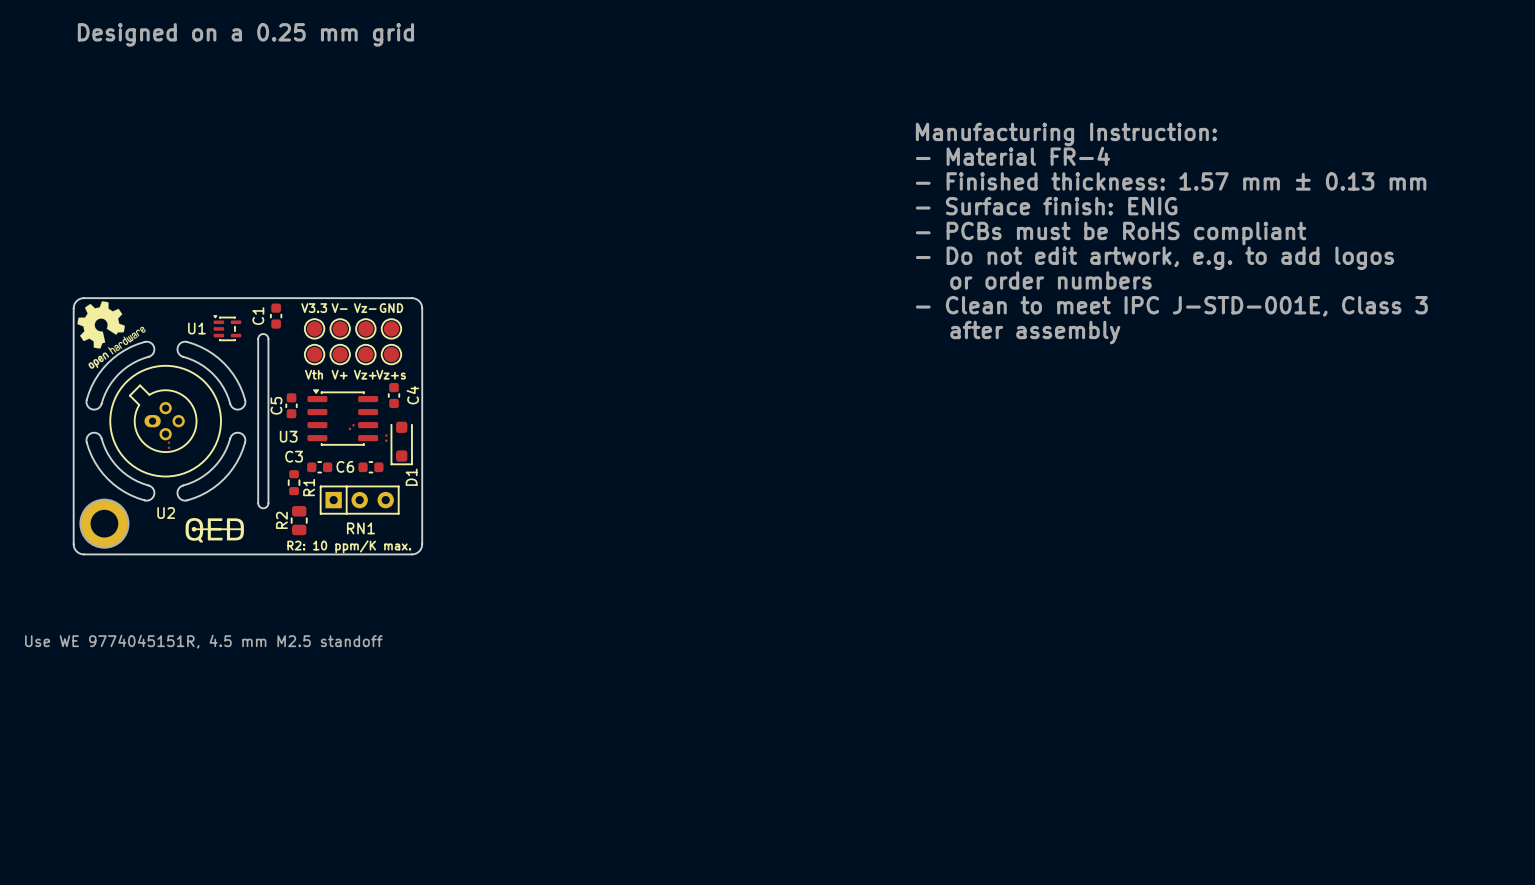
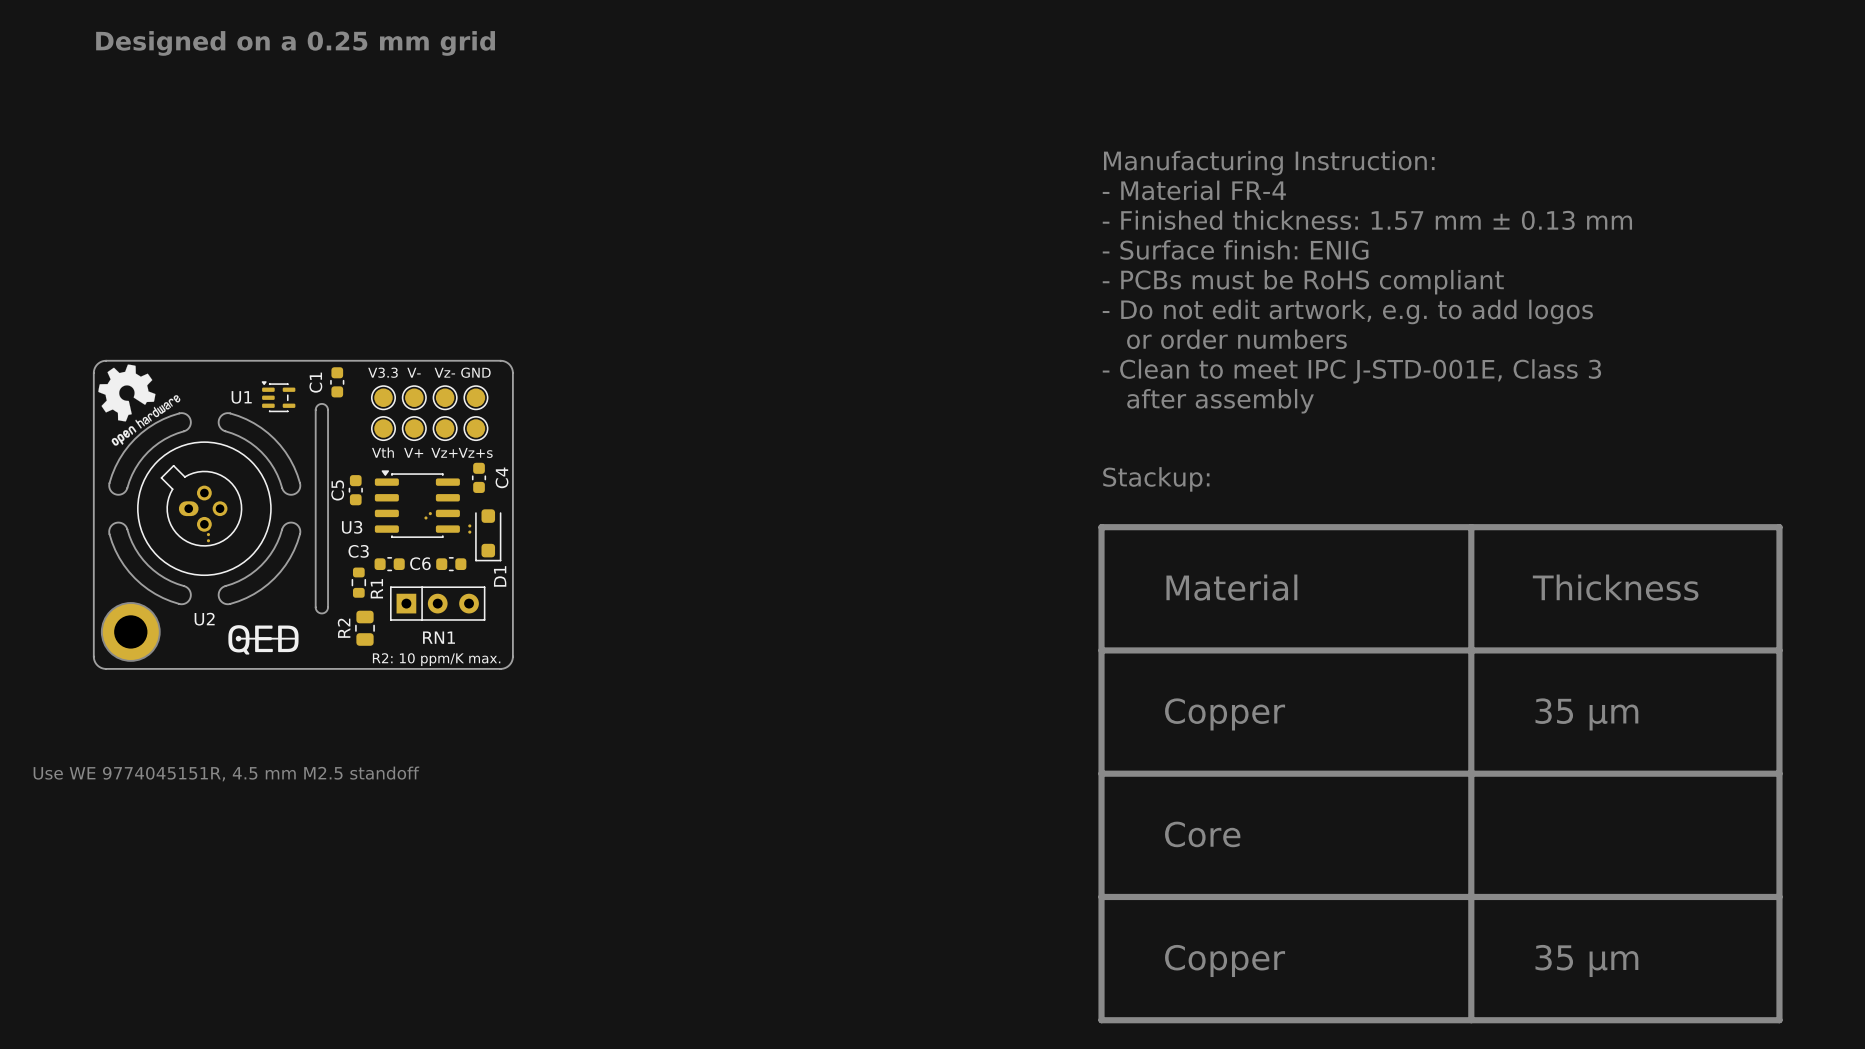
text: none -> Stackup: (1156, 479)
line: none -> (1101, 527) (1101, 1020) (1779, 1020) (1779, 527) (1101, 527)
line: none -> (1471, 527) (1471, 1020)
text: none -> Material (1231, 587)
text: none -> Thickness (1615, 587)
line: none -> (1101, 650) (1779, 650)
text: none -> Copper (1225, 714)
text: none -> 35 µm (1586, 714)
line: none -> (1101, 773) (1779, 773)
text: none -> Core (1202, 834)
line: none -> (1101, 896) (1779, 896)
text: none -> Copper (1225, 960)
text: none -> 35 µm (1586, 960)

